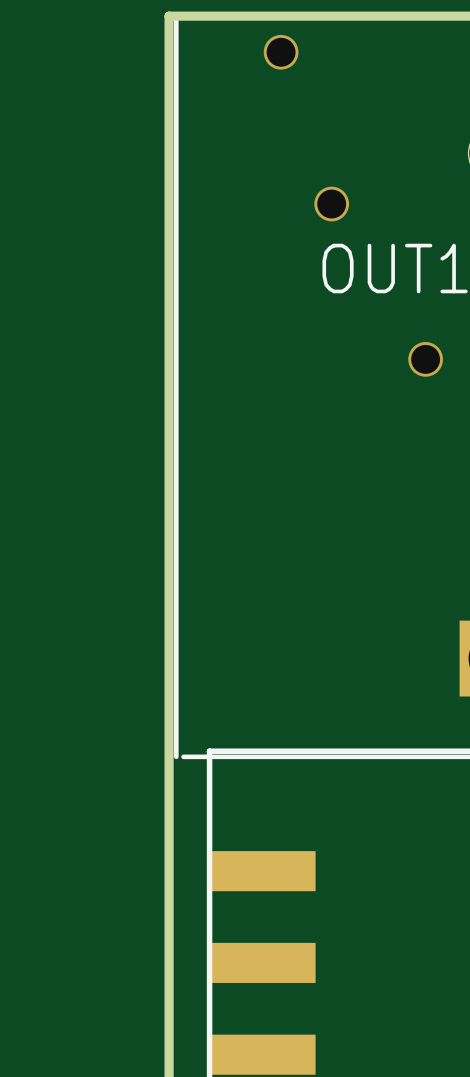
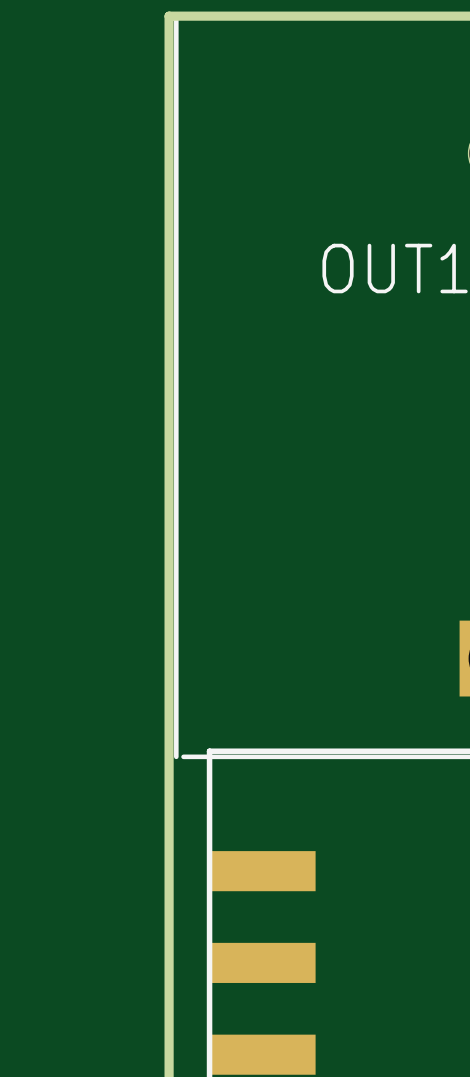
via: (281, 52) -> none
via: (331, 204) -> none
via: (425, 359) -> none

